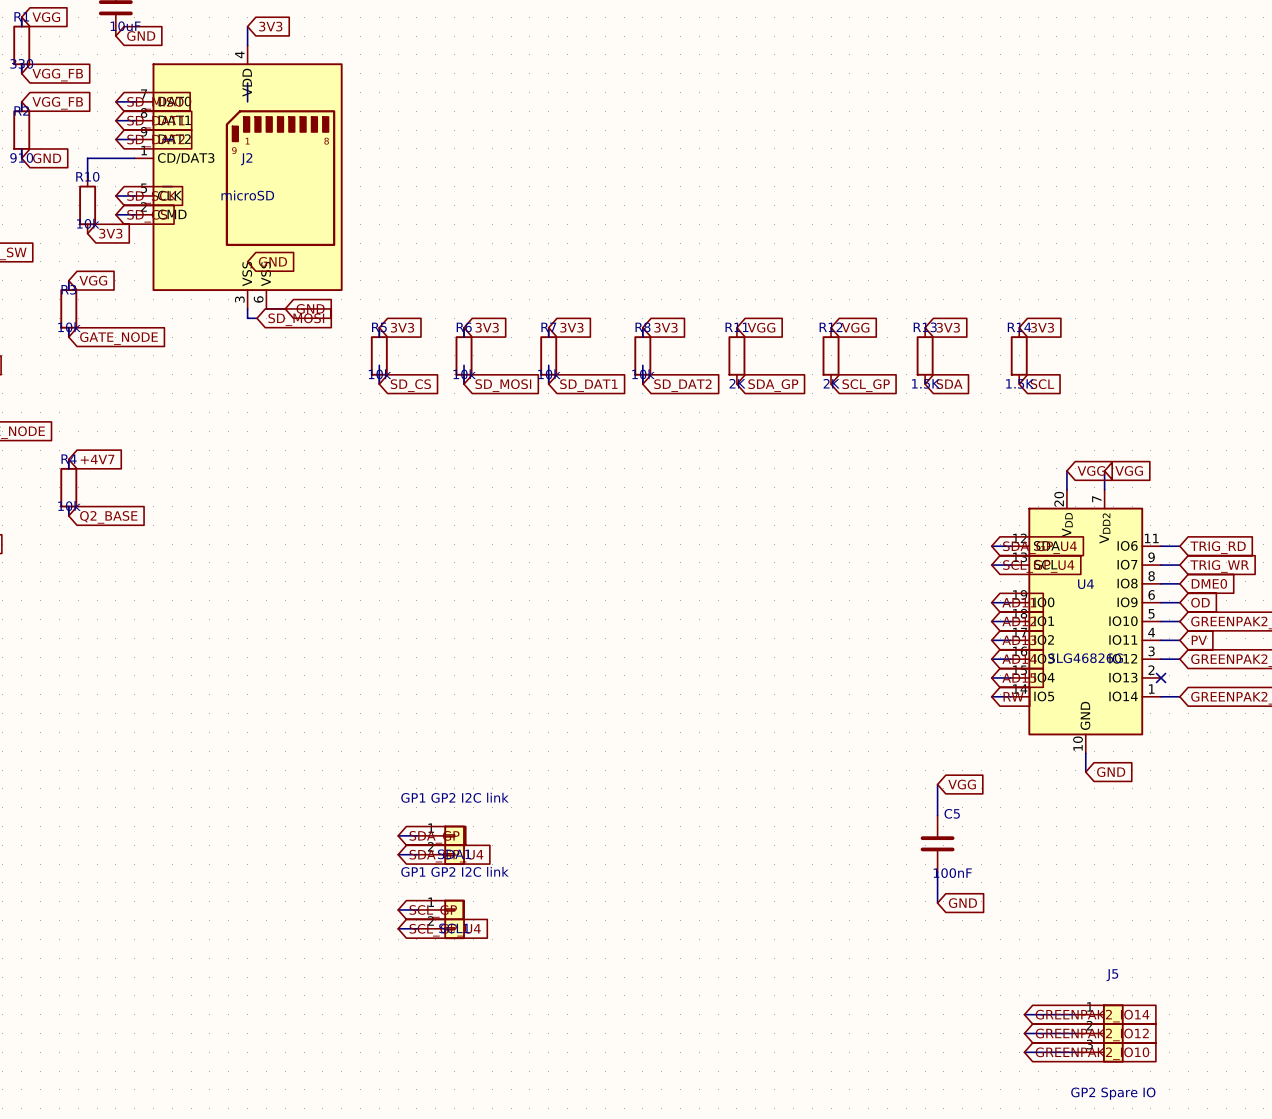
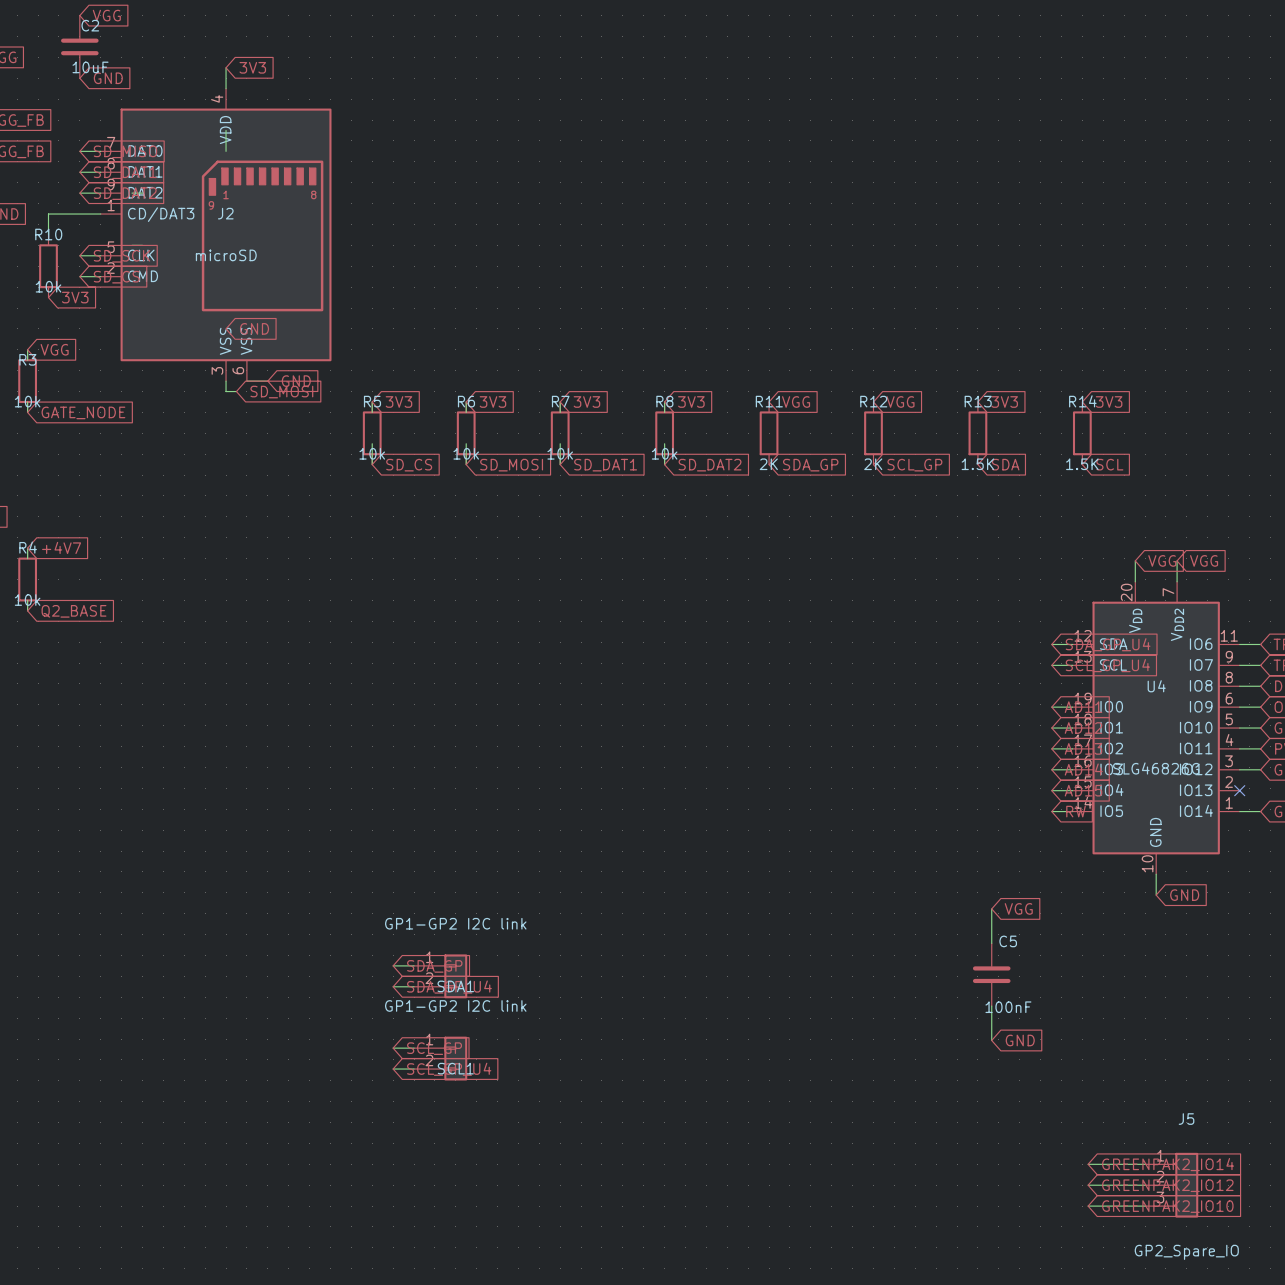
SDA1 value: GP1 GP2 I2C link (454, 797) -> GP1-GP2 I2C link (455, 923)
SCL1 value: GP1 GP2 I2C link (454, 871) -> GP1-GP2 I2C link (455, 1005)
J5 value: GP2 Spare IO (1113, 1093) -> GP2_Spare_IO (1186, 1252)

